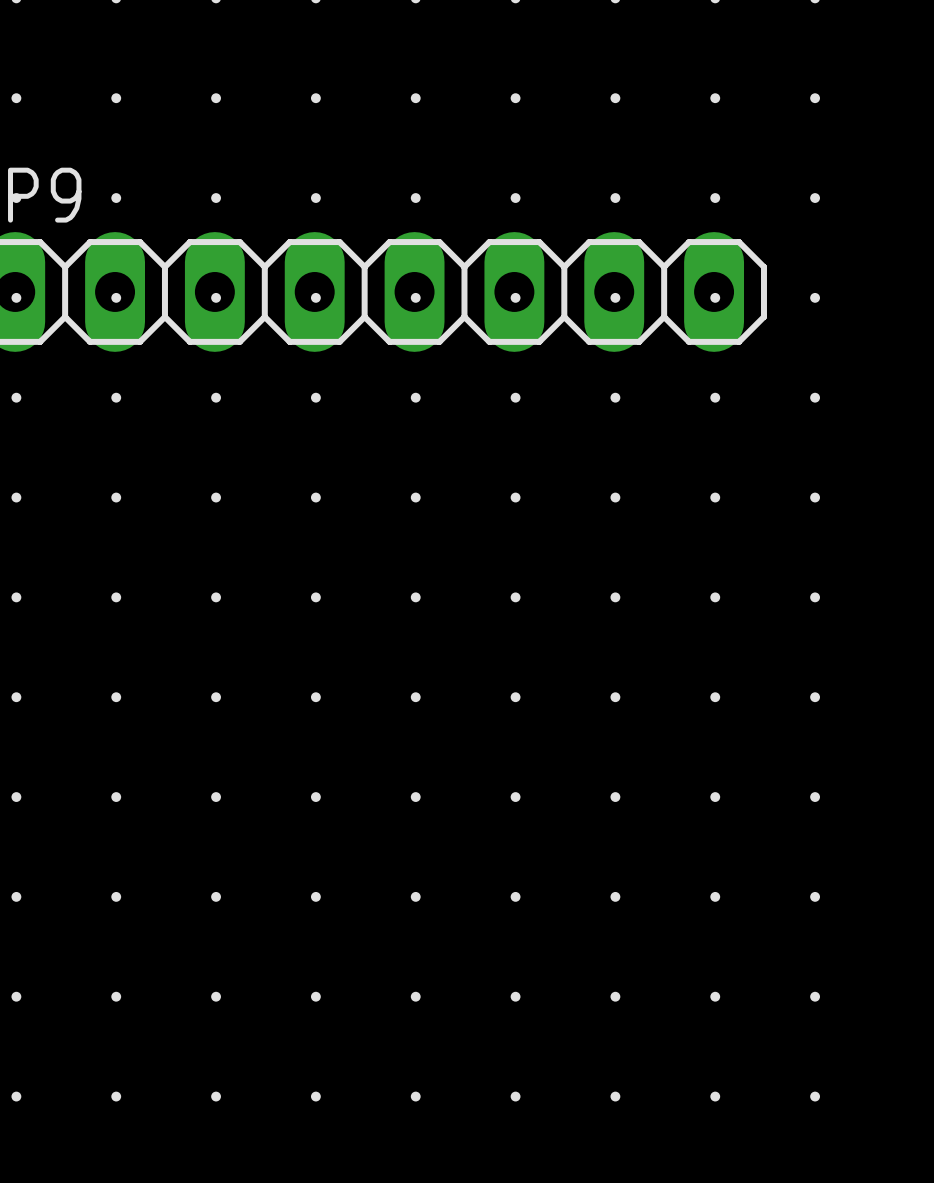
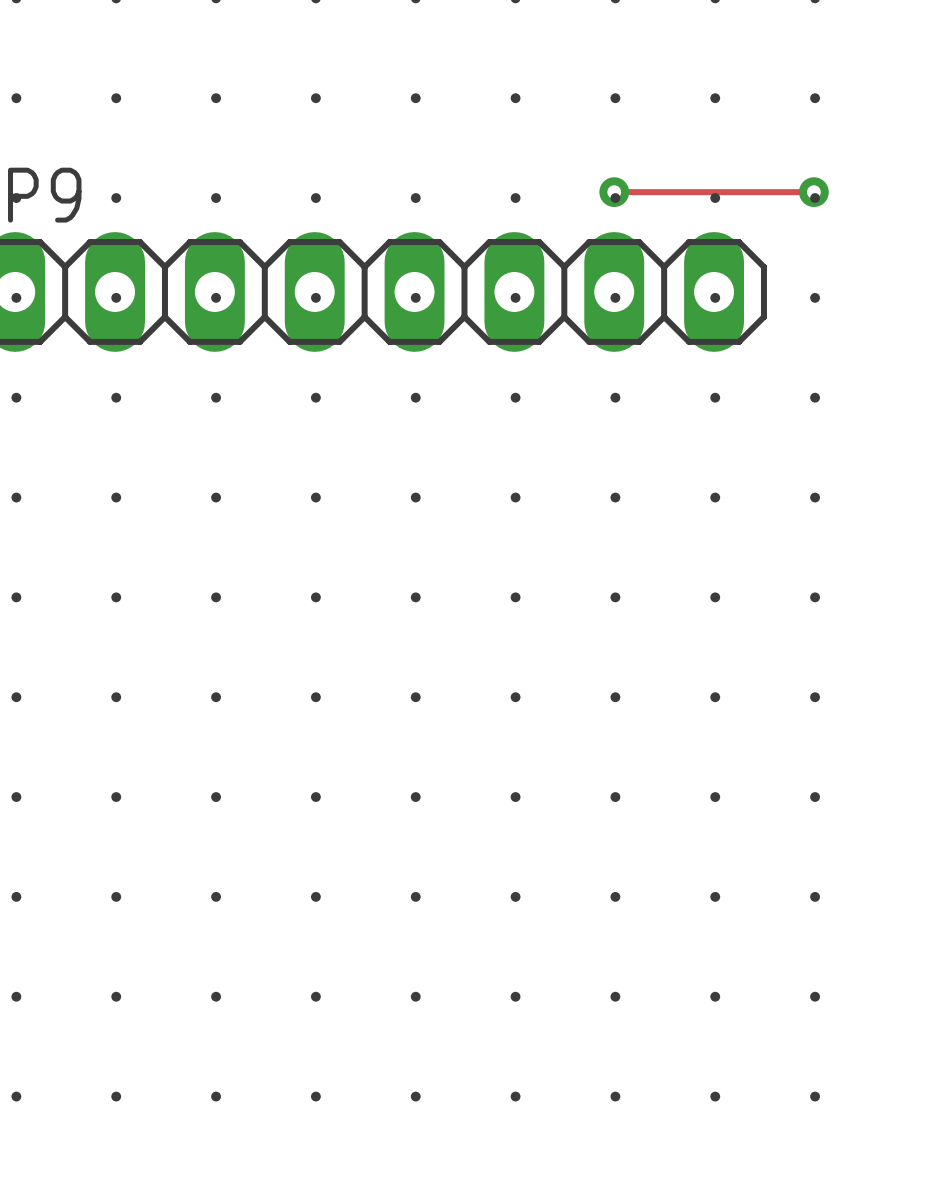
track: none -> (614, 192) (813, 192)
via: none -> (614, 192)
via: none -> (813, 192)

